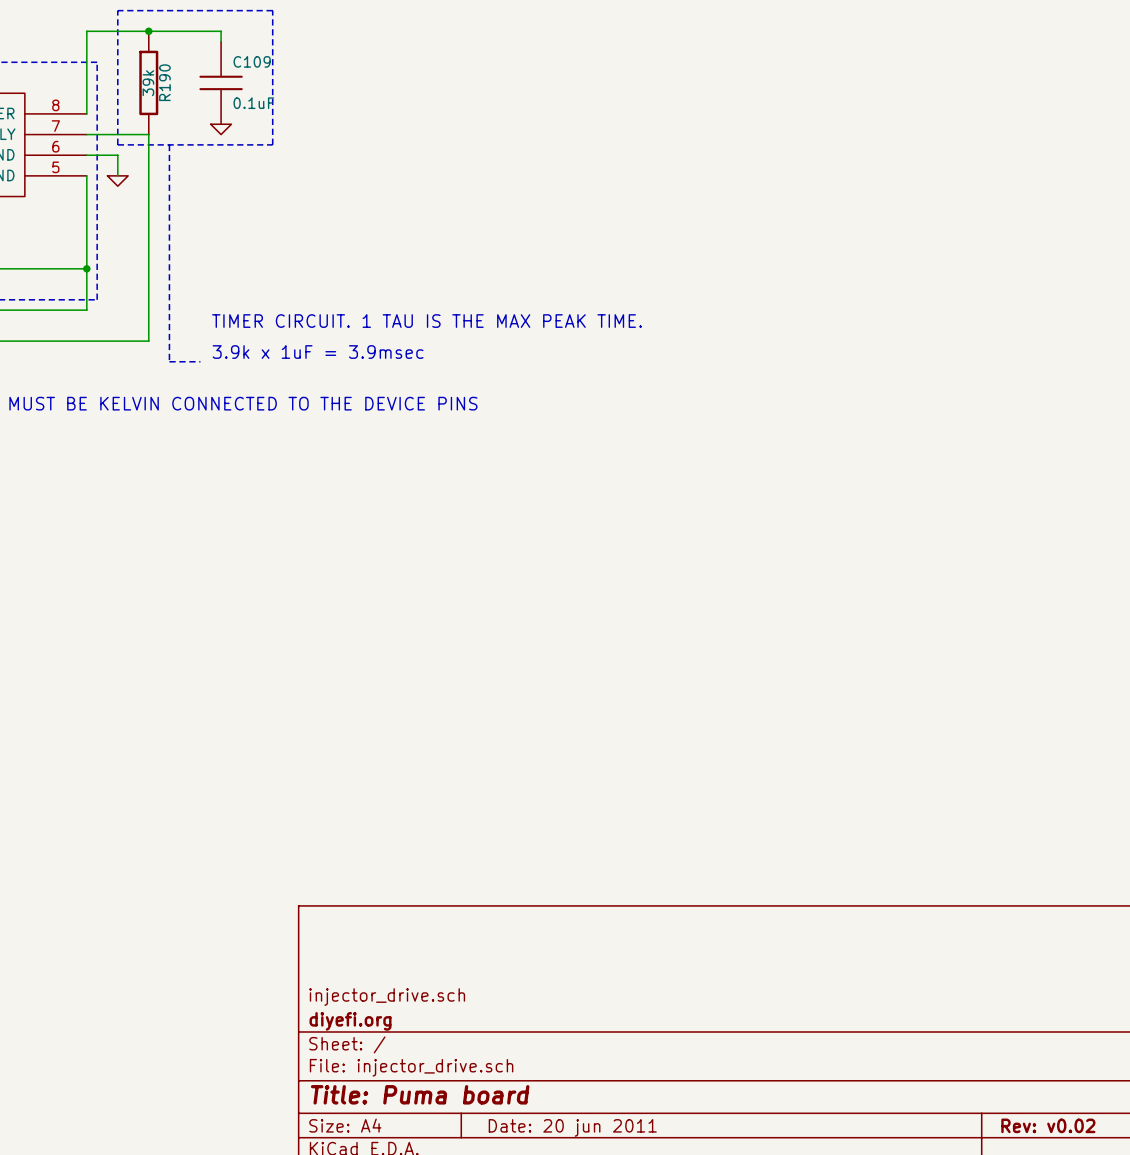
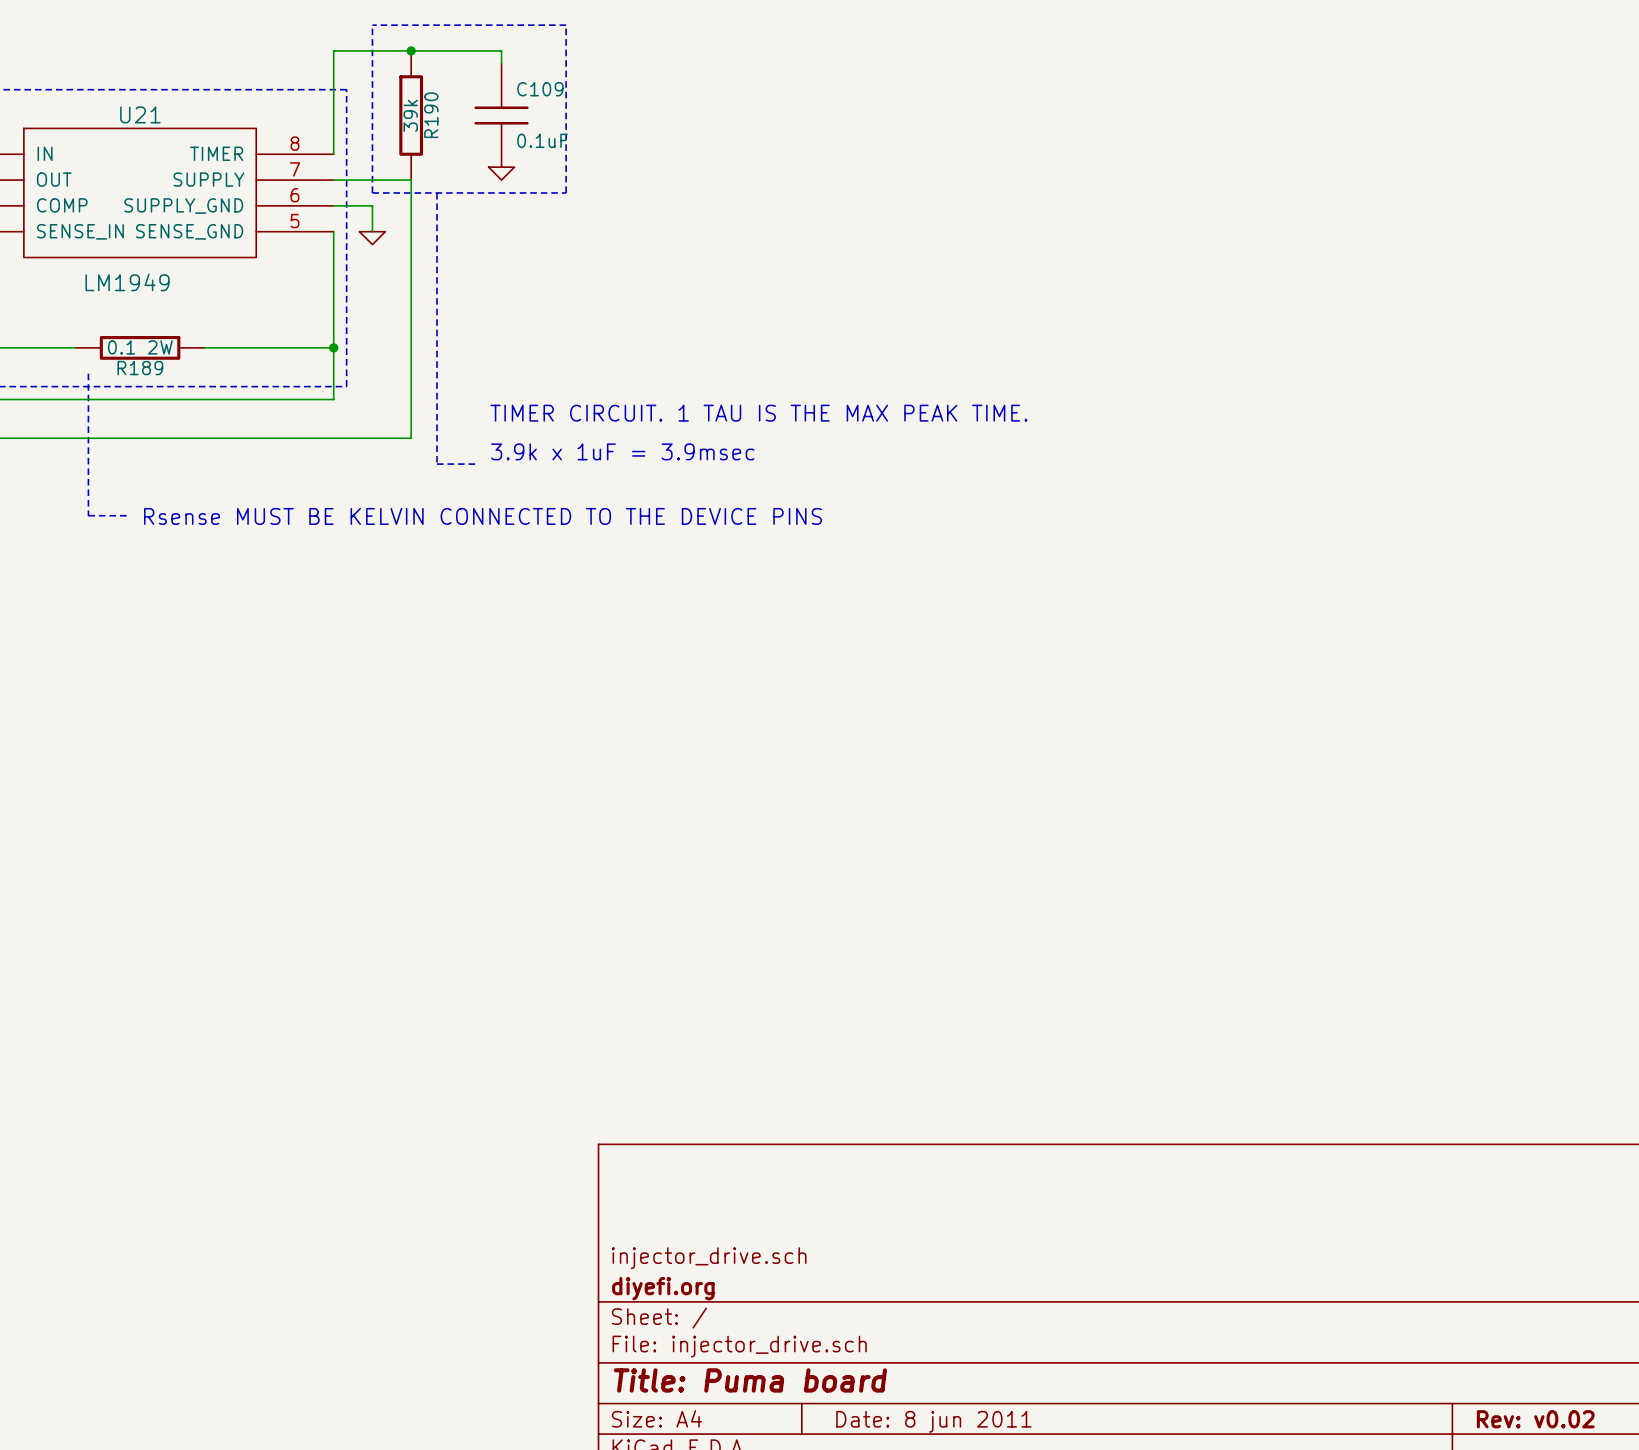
title block: Date: 20 jun 2011 (572, 1127) -> Date: 8 jun 2011 (933, 1421)

